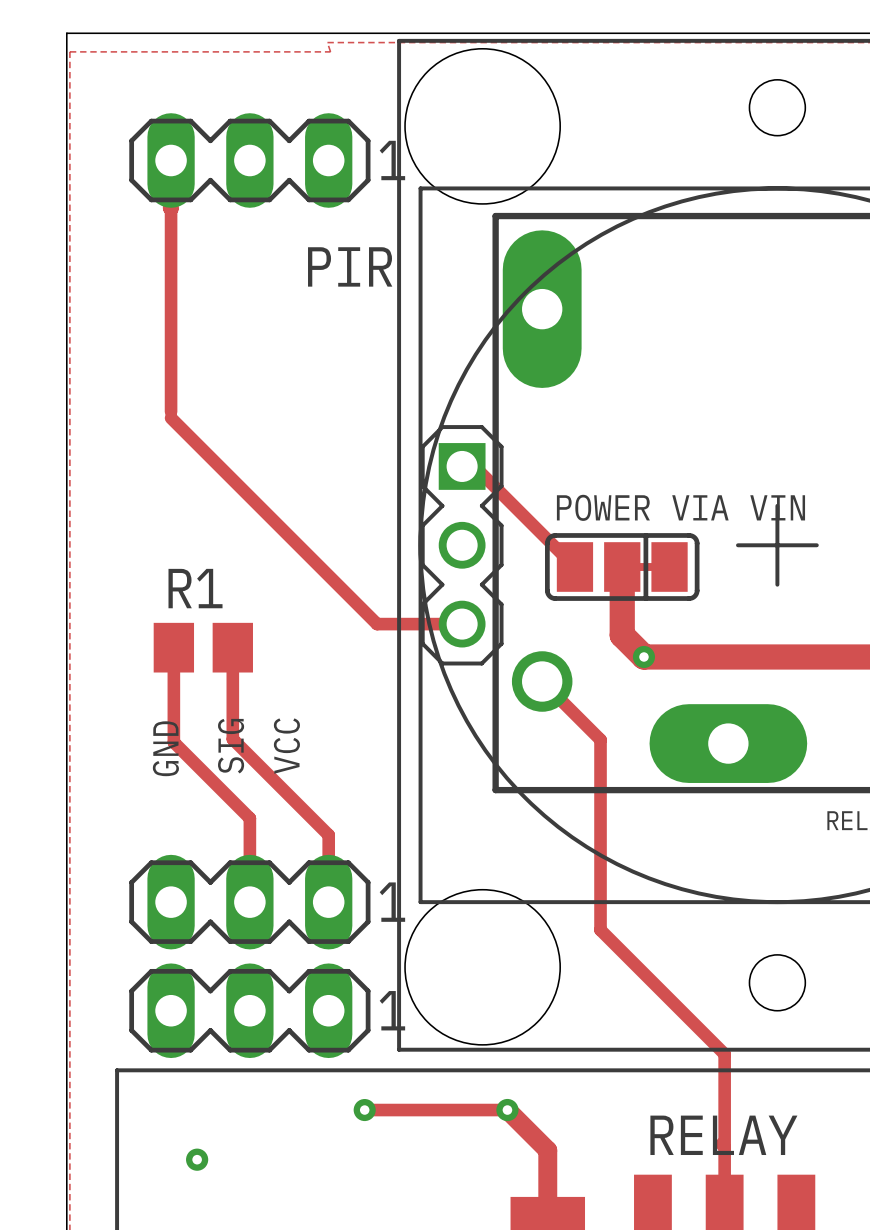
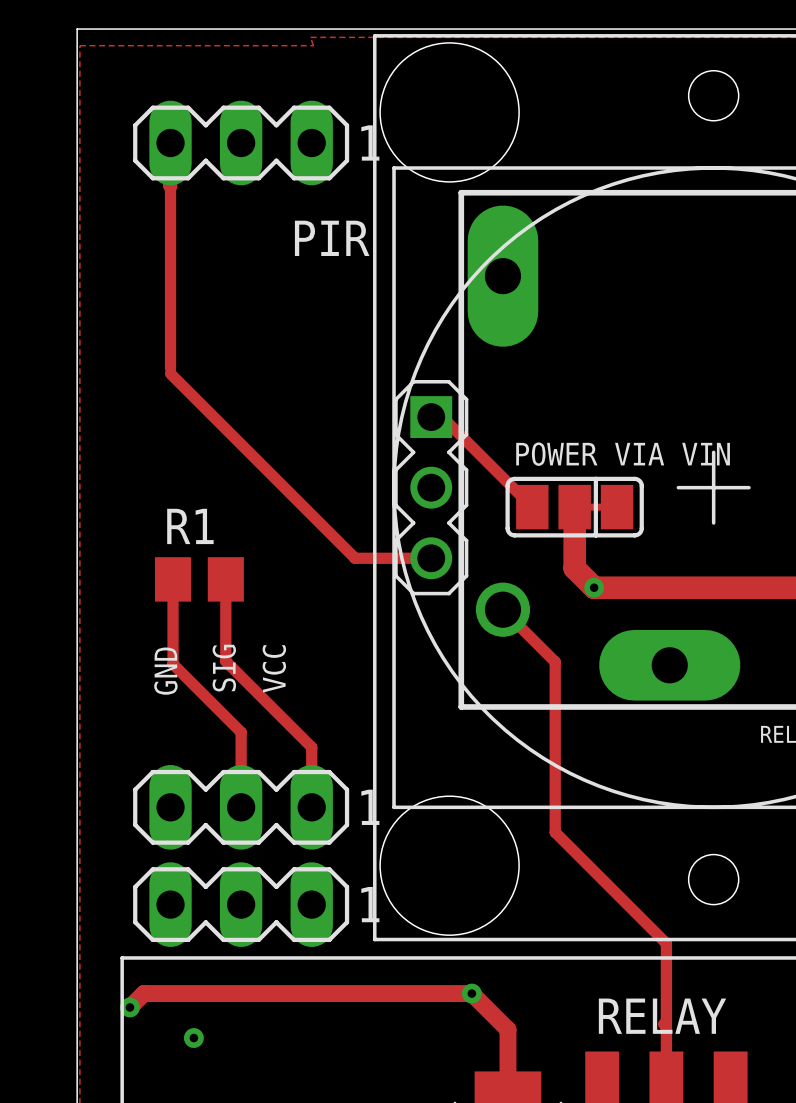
track: none -> (343, 993) (143, 993) (129, 1007)
track width: thin (364, 1110) (507, 1110) -> thick (343, 993) (471, 993)
via: (364, 1110) -> none
via: none -> (129, 1007)

